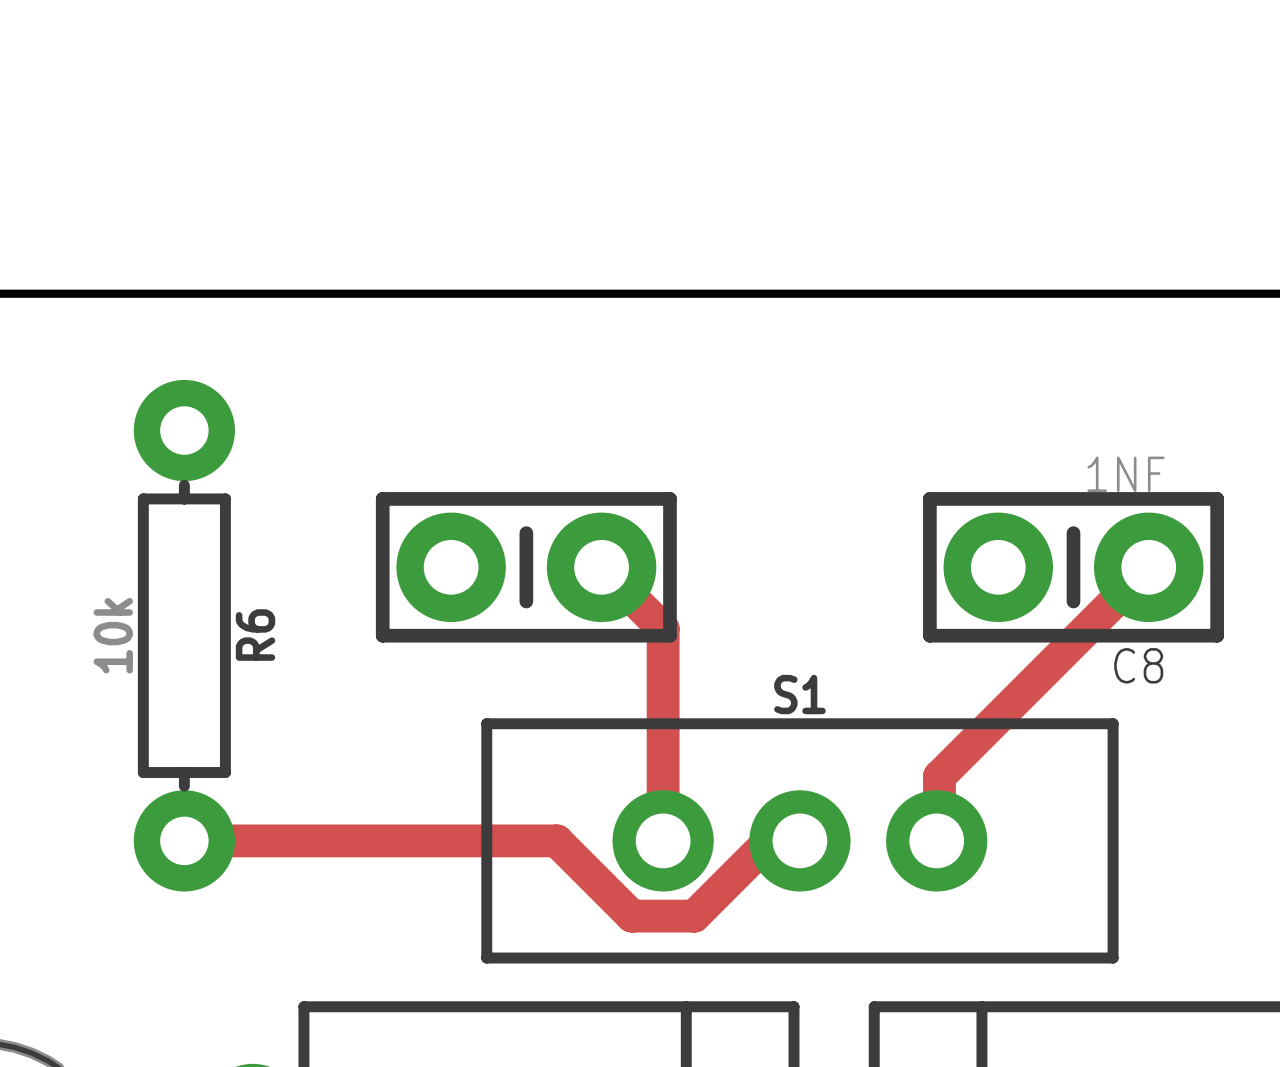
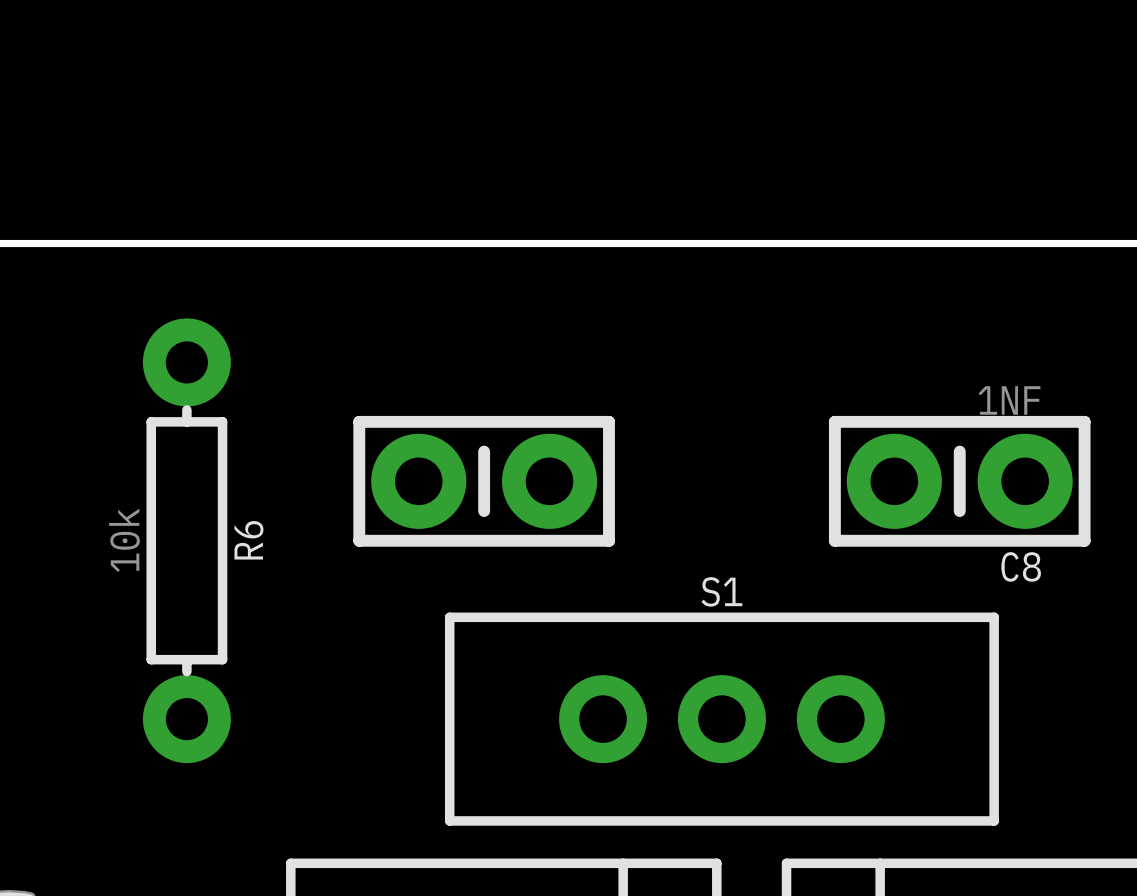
track: (601, 567) (663, 628) (663, 840) -> none
track: (1148, 567) (939, 776) (939, 838) (936, 840) -> none
track: (184, 840) (556, 840) (631, 916) (694, 916) (769, 840) (799, 840) -> none

